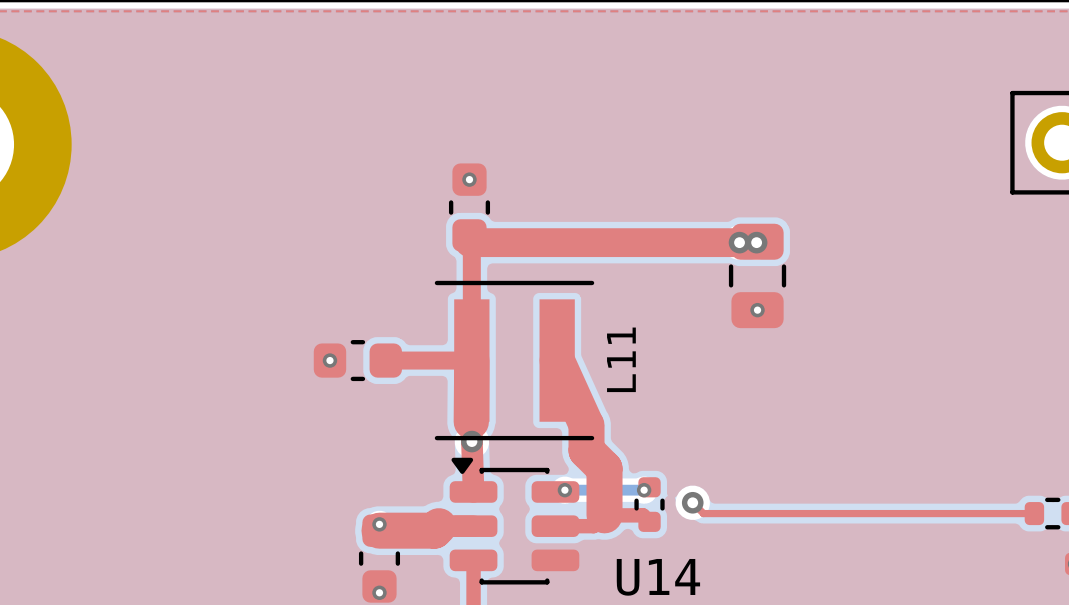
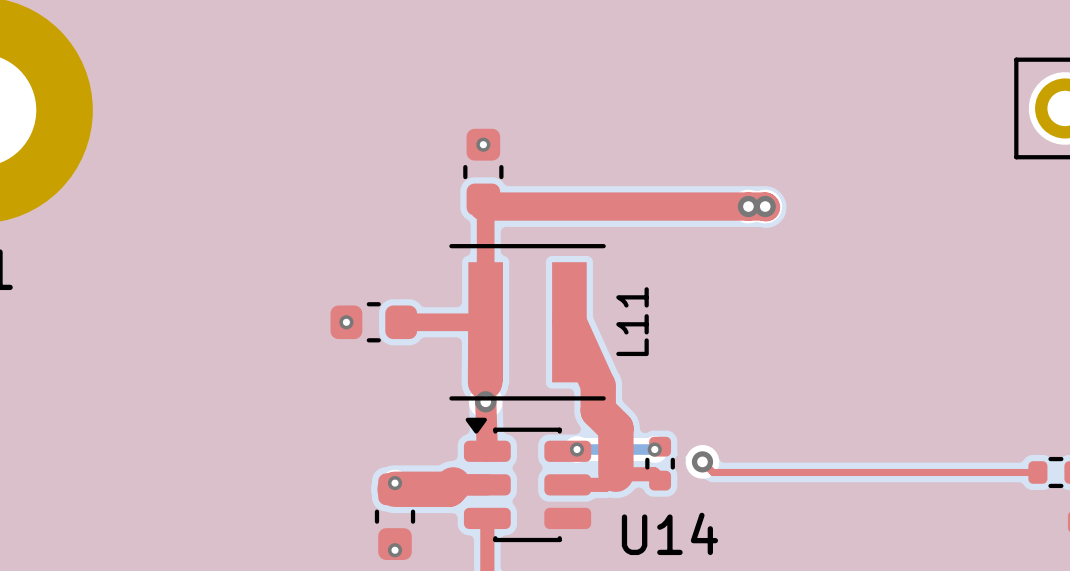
part: (757, 275) -> none
via: (757, 310) -> none

